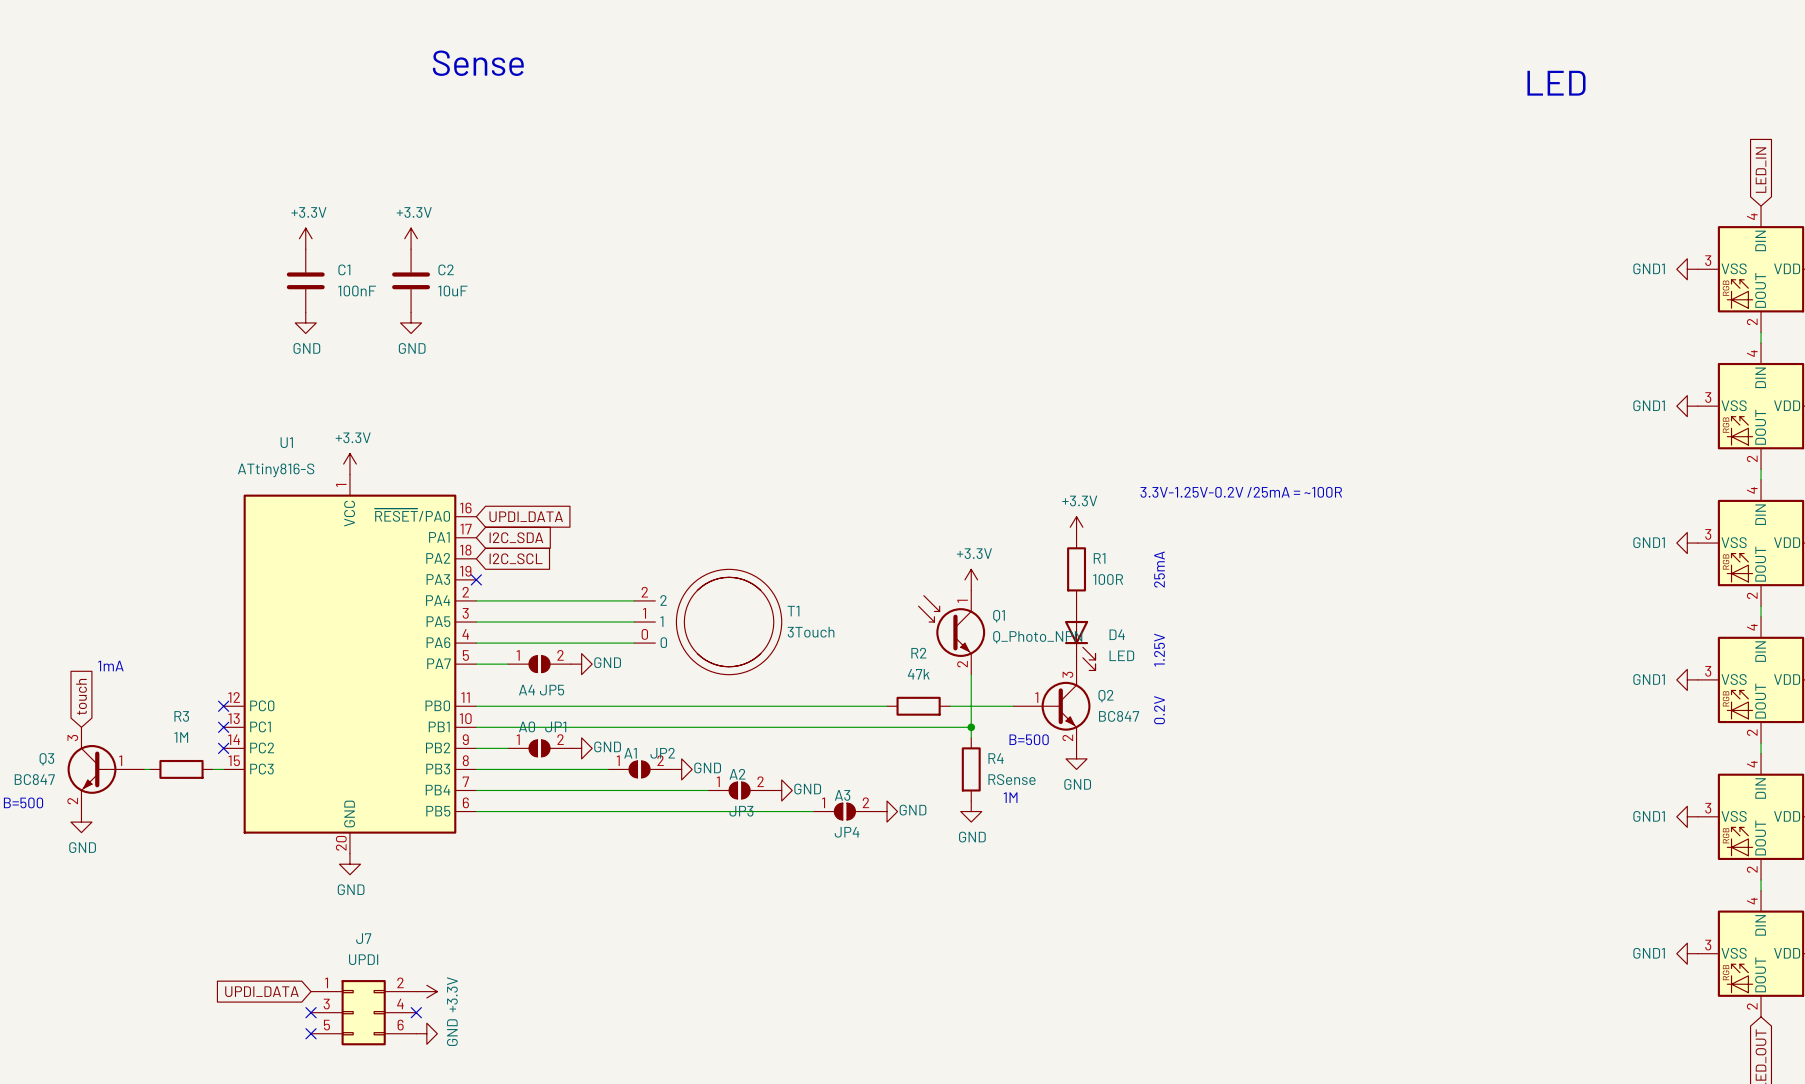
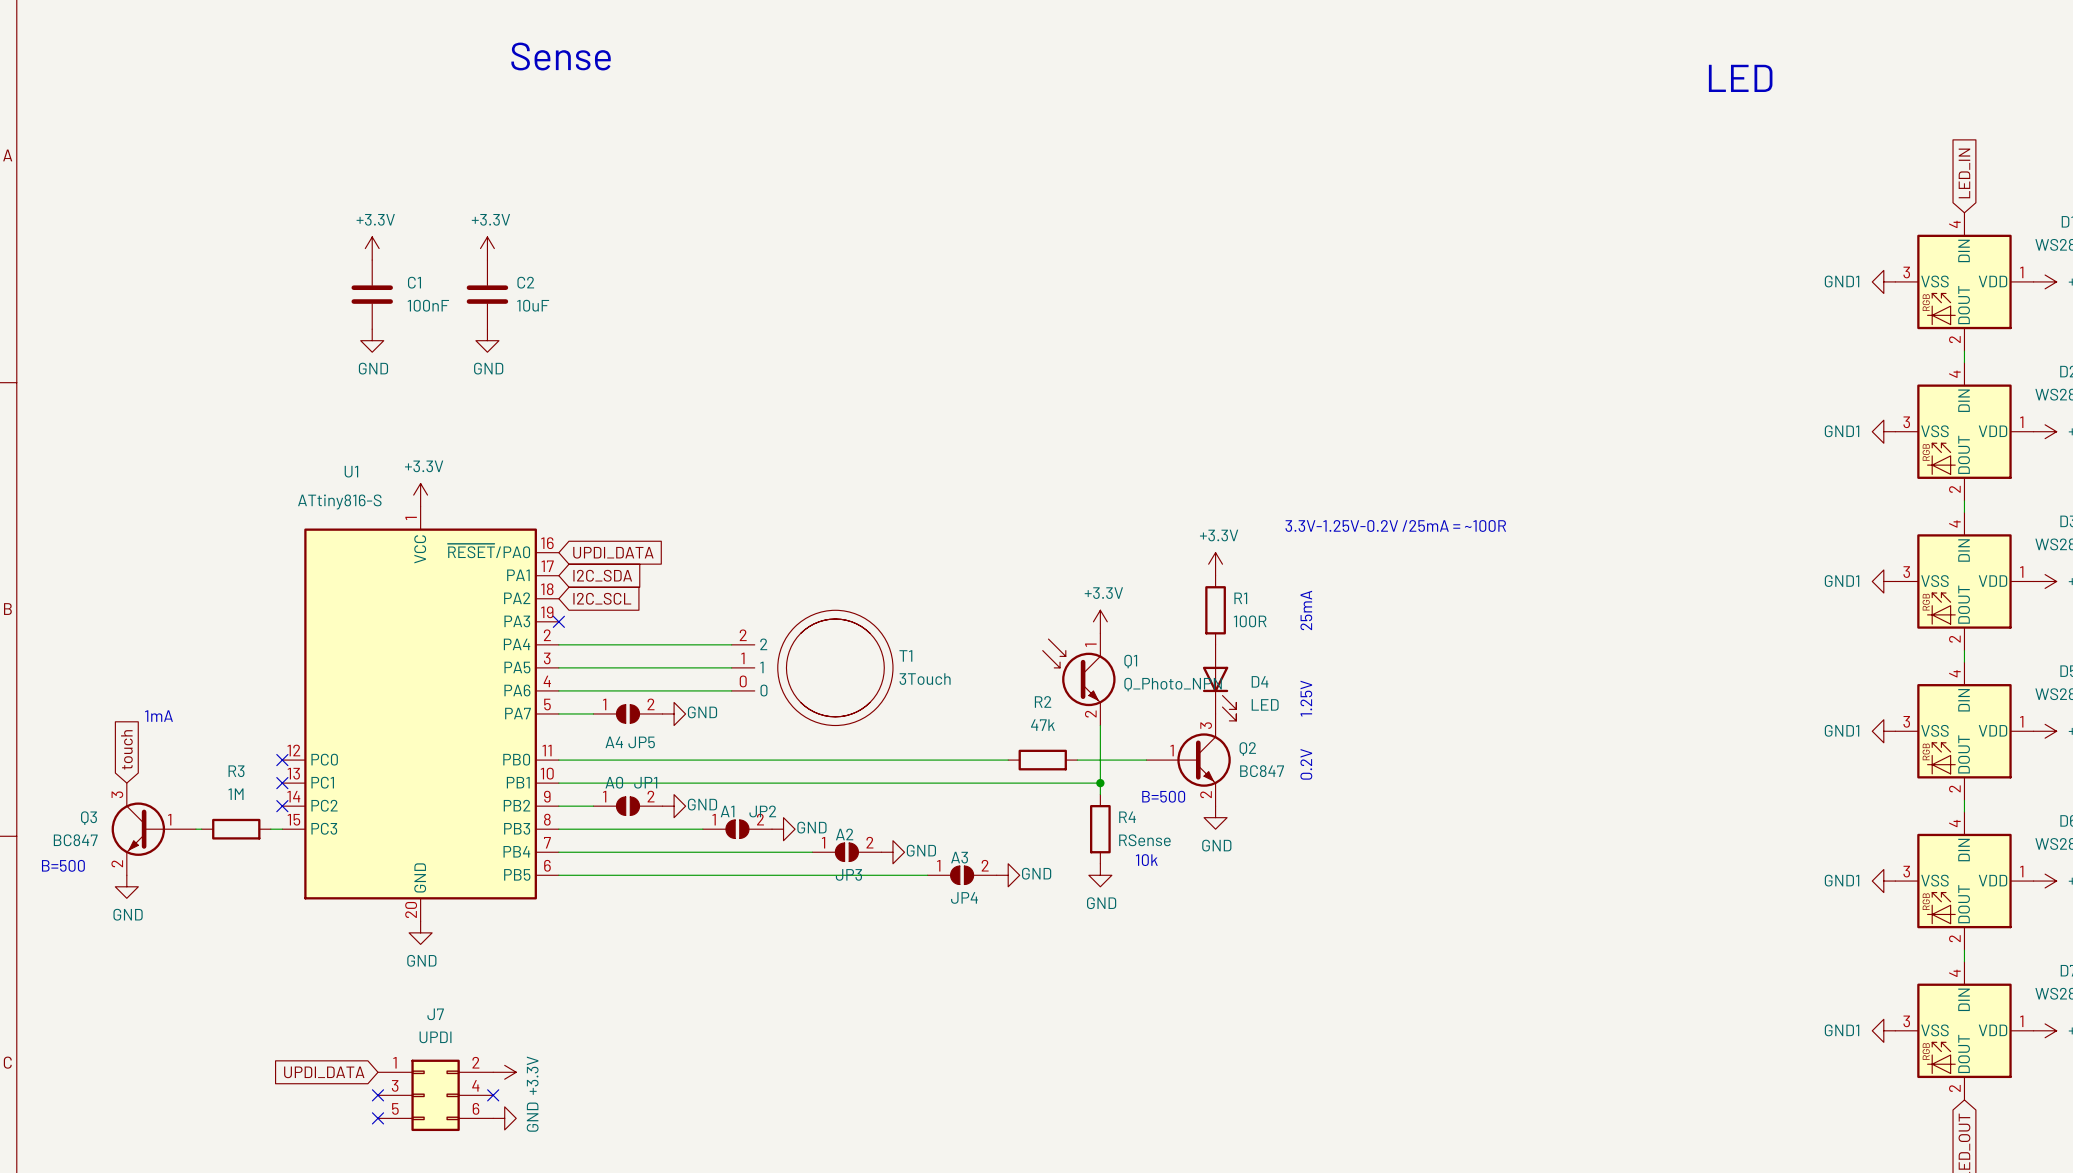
text: 1M (1010, 797) -> 10k (1146, 860)

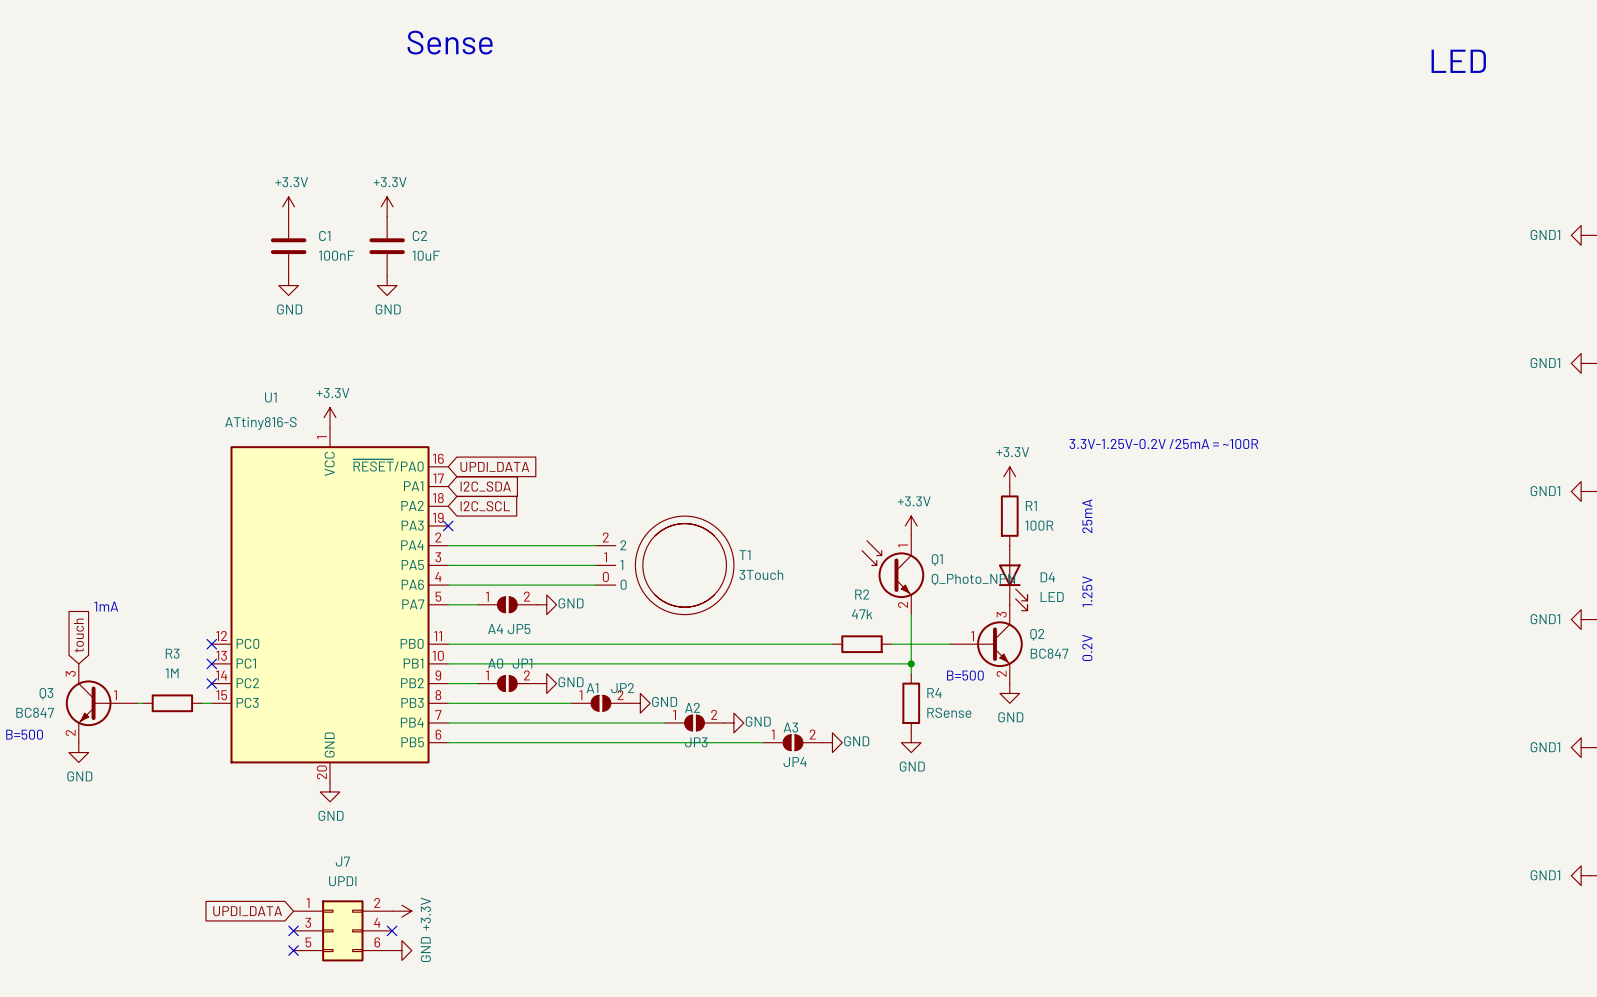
text: 10k (1146, 860) -> none

